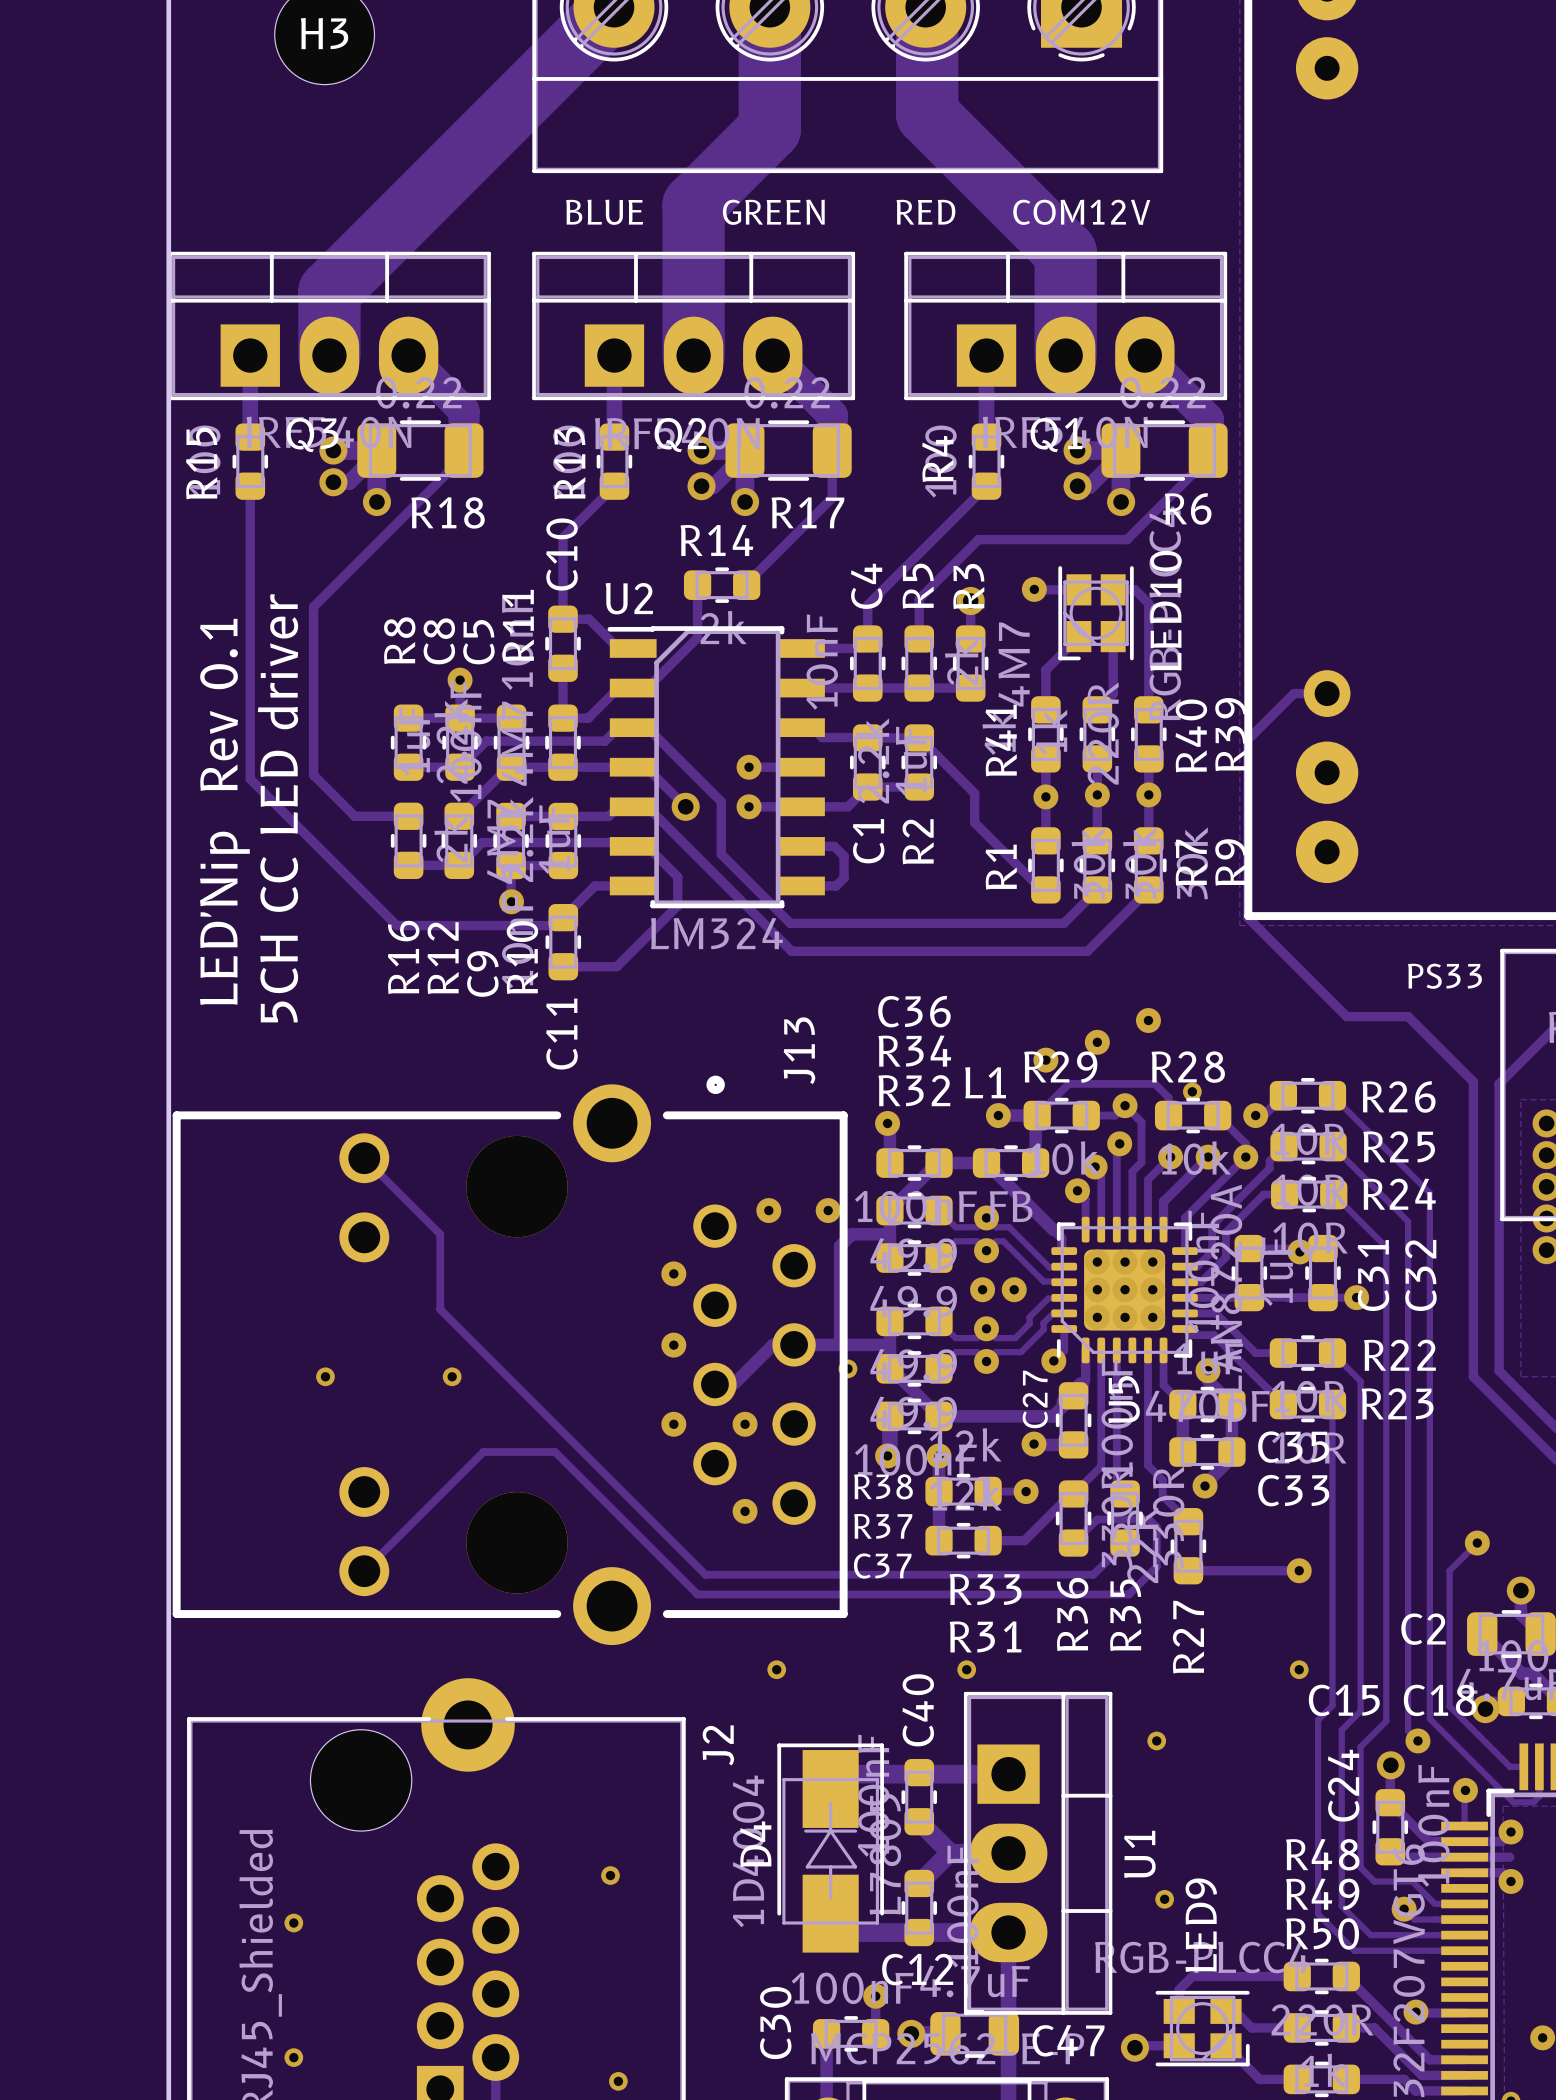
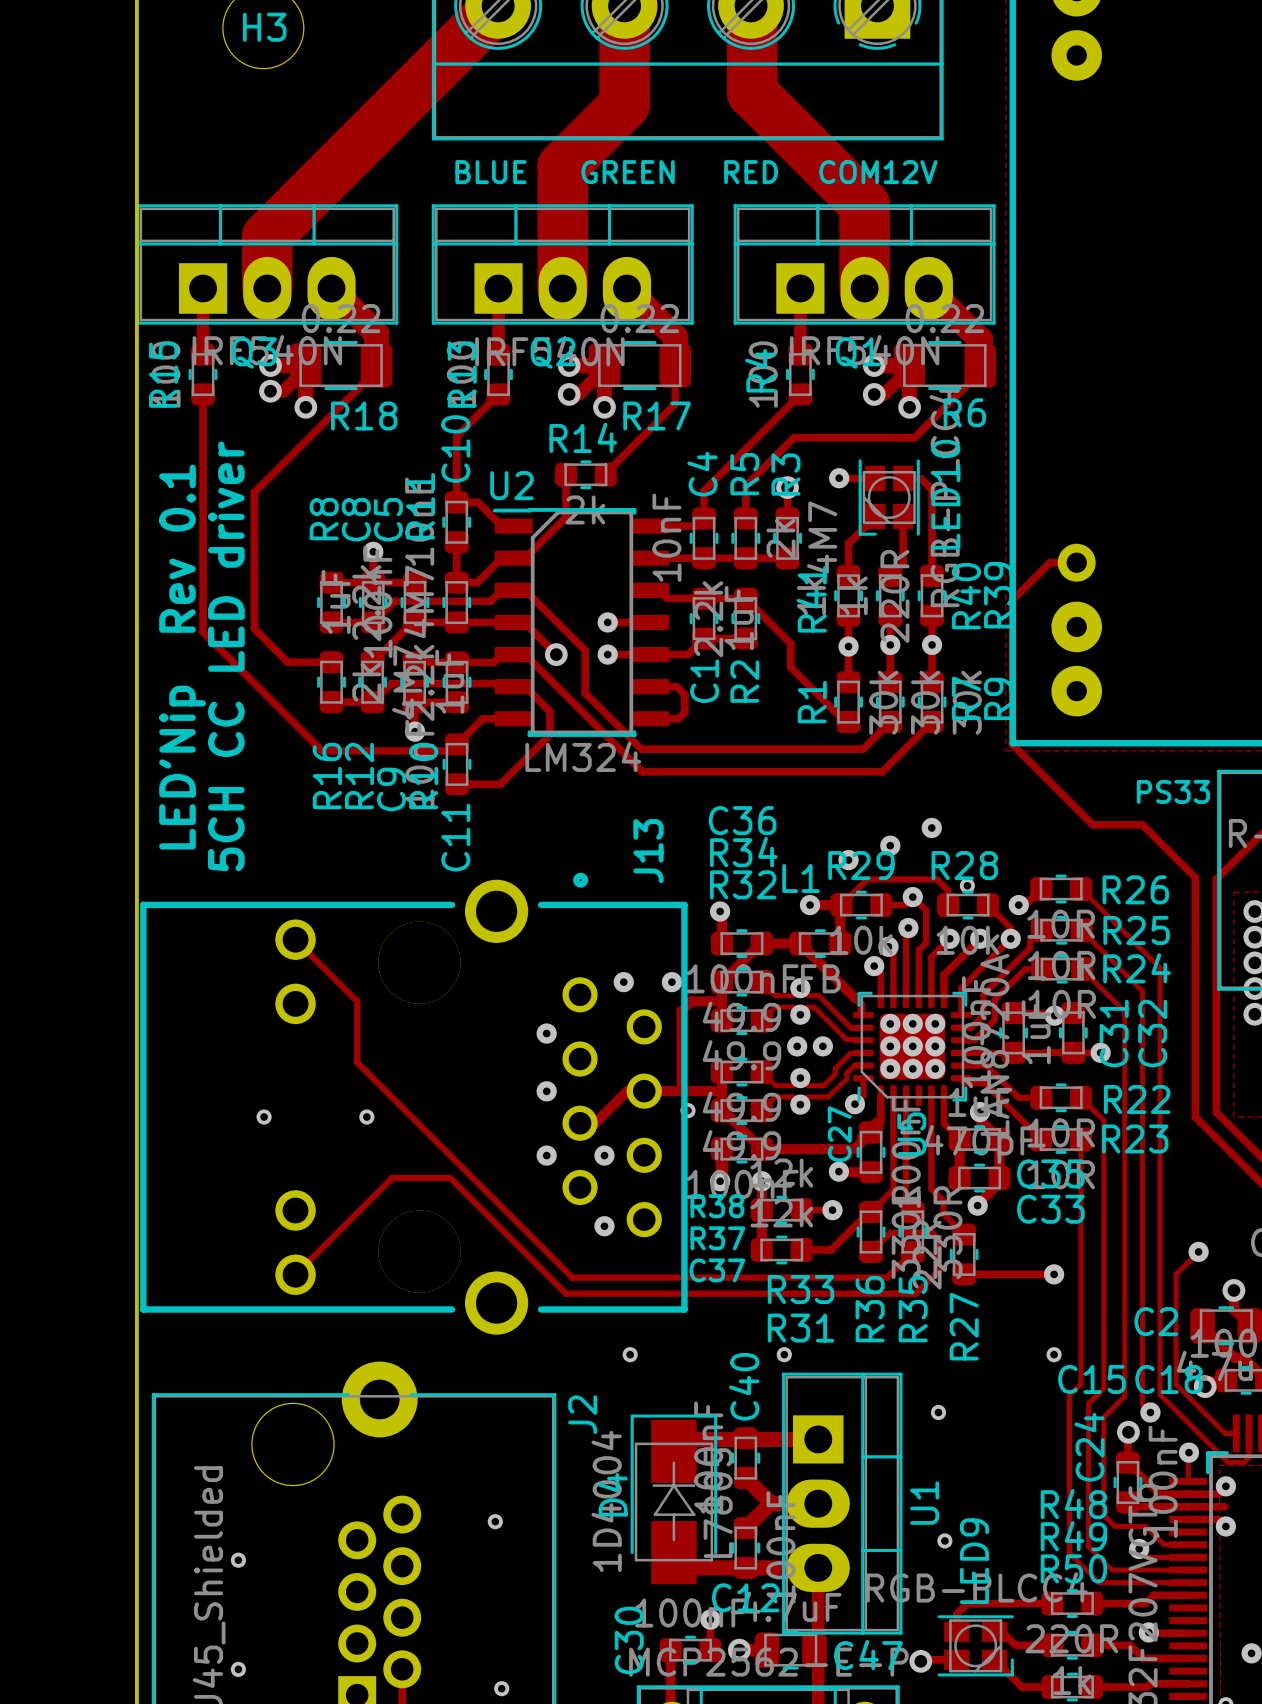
track: (1346, 1976) (1429, 2059) (1464, 2059) -> (1092, 1603) (1145, 1603) (1153, 1595) (1188, 1595)
track: (1374, 2027) (1421, 2075) -> (1115, 1645) (1130, 1645) (1143, 1658) (1188, 1658)
track: (1404, 2079) (1415, 2090) (1464, 2090) -> (1139, 1687) (1147, 1687) (1153, 1683)

